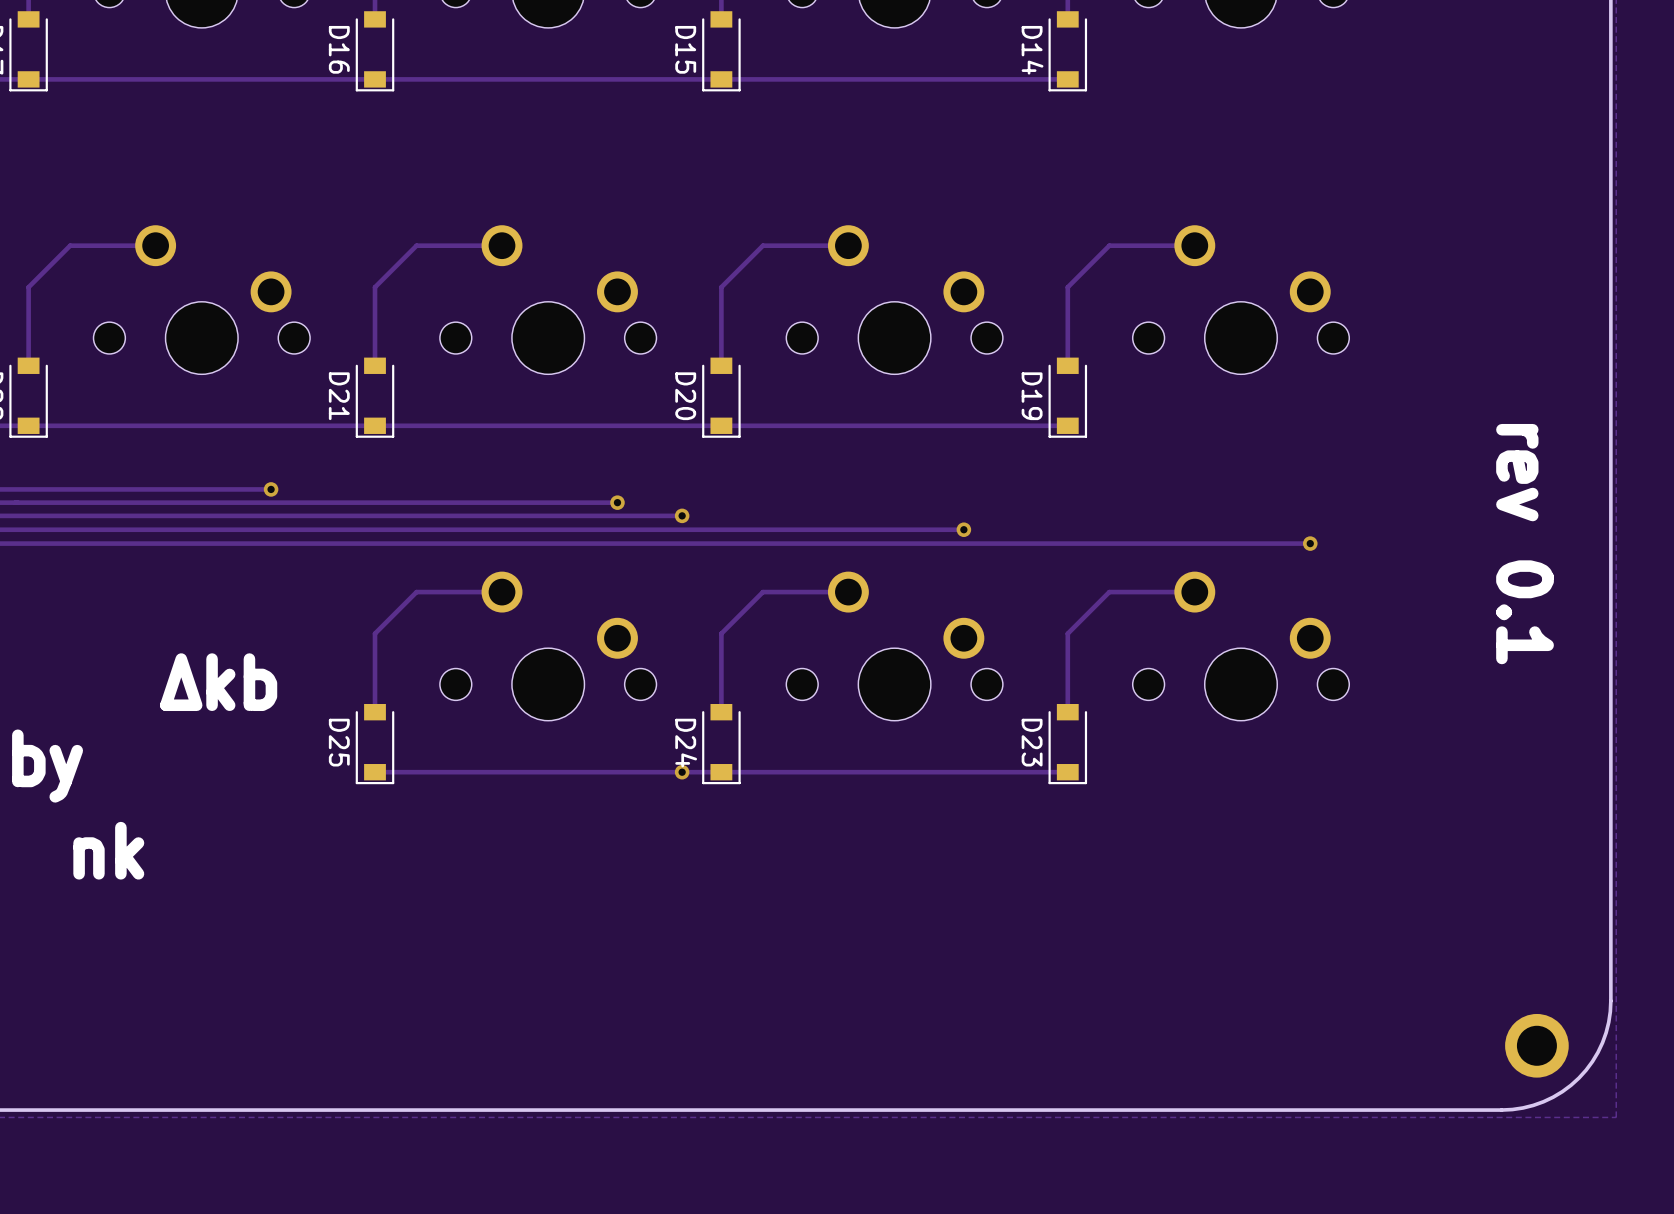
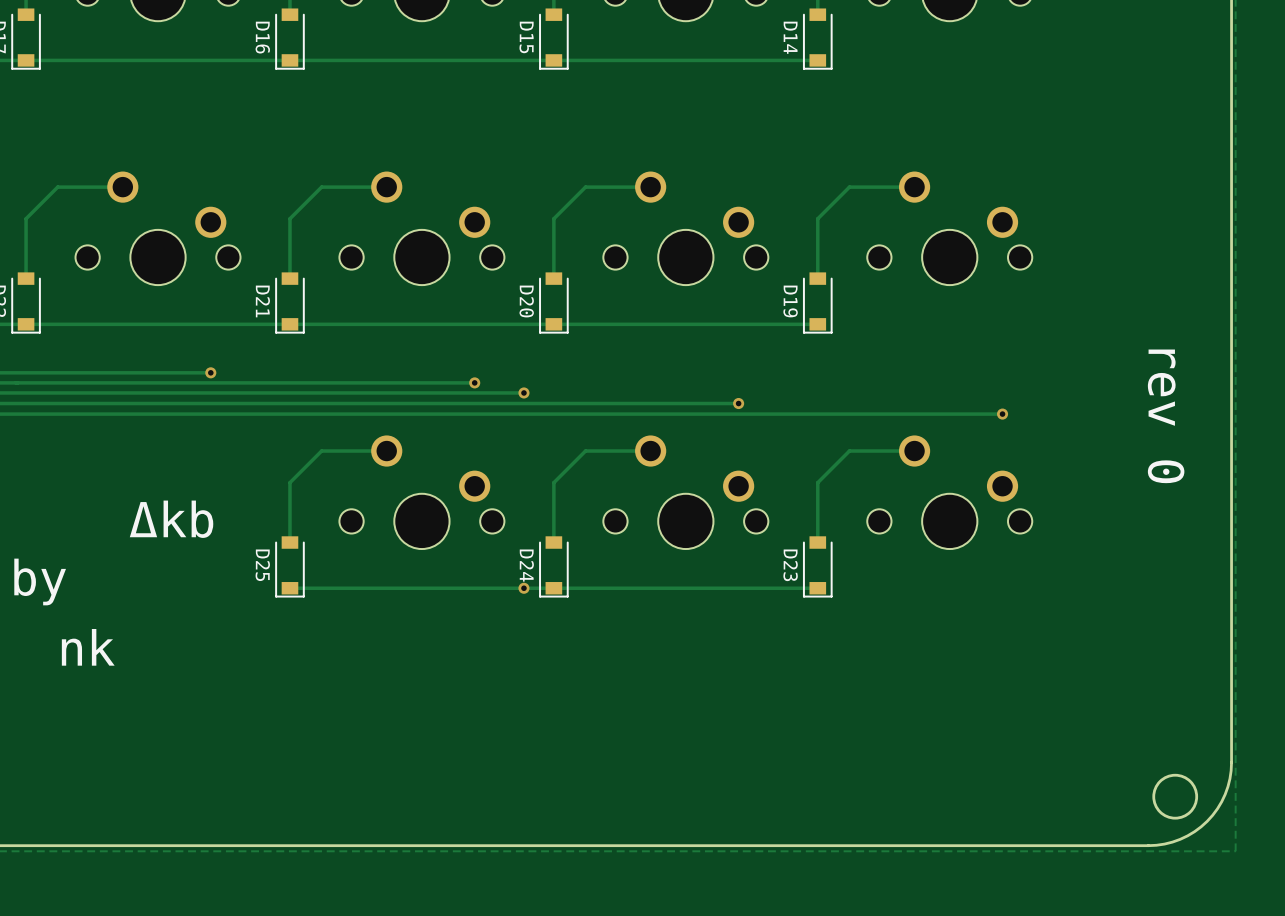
text: rev 0.1 (1525, 544) -> rev 0 (1166, 416)
round board edge: none -> [1152, 773, 1199, 820]
part: (1536, 1045) -> none

